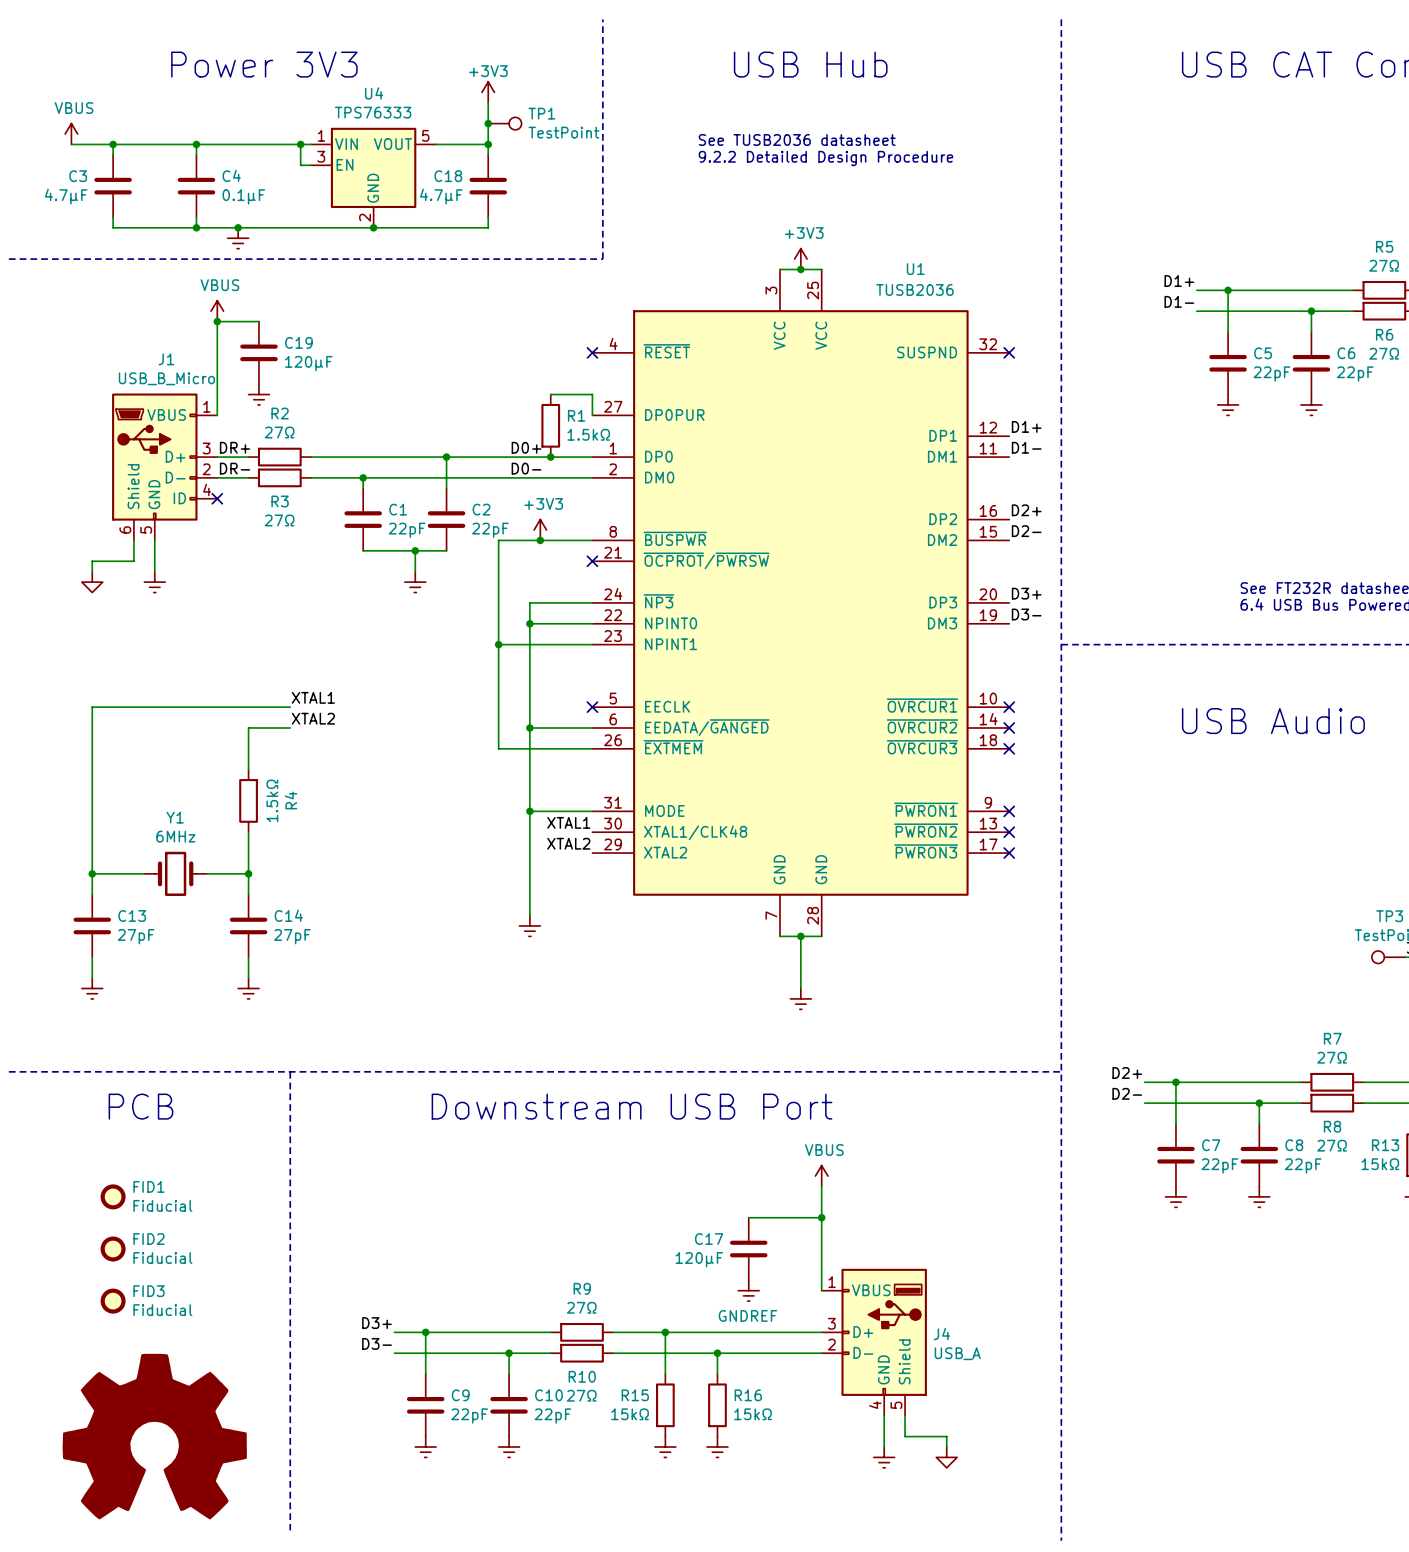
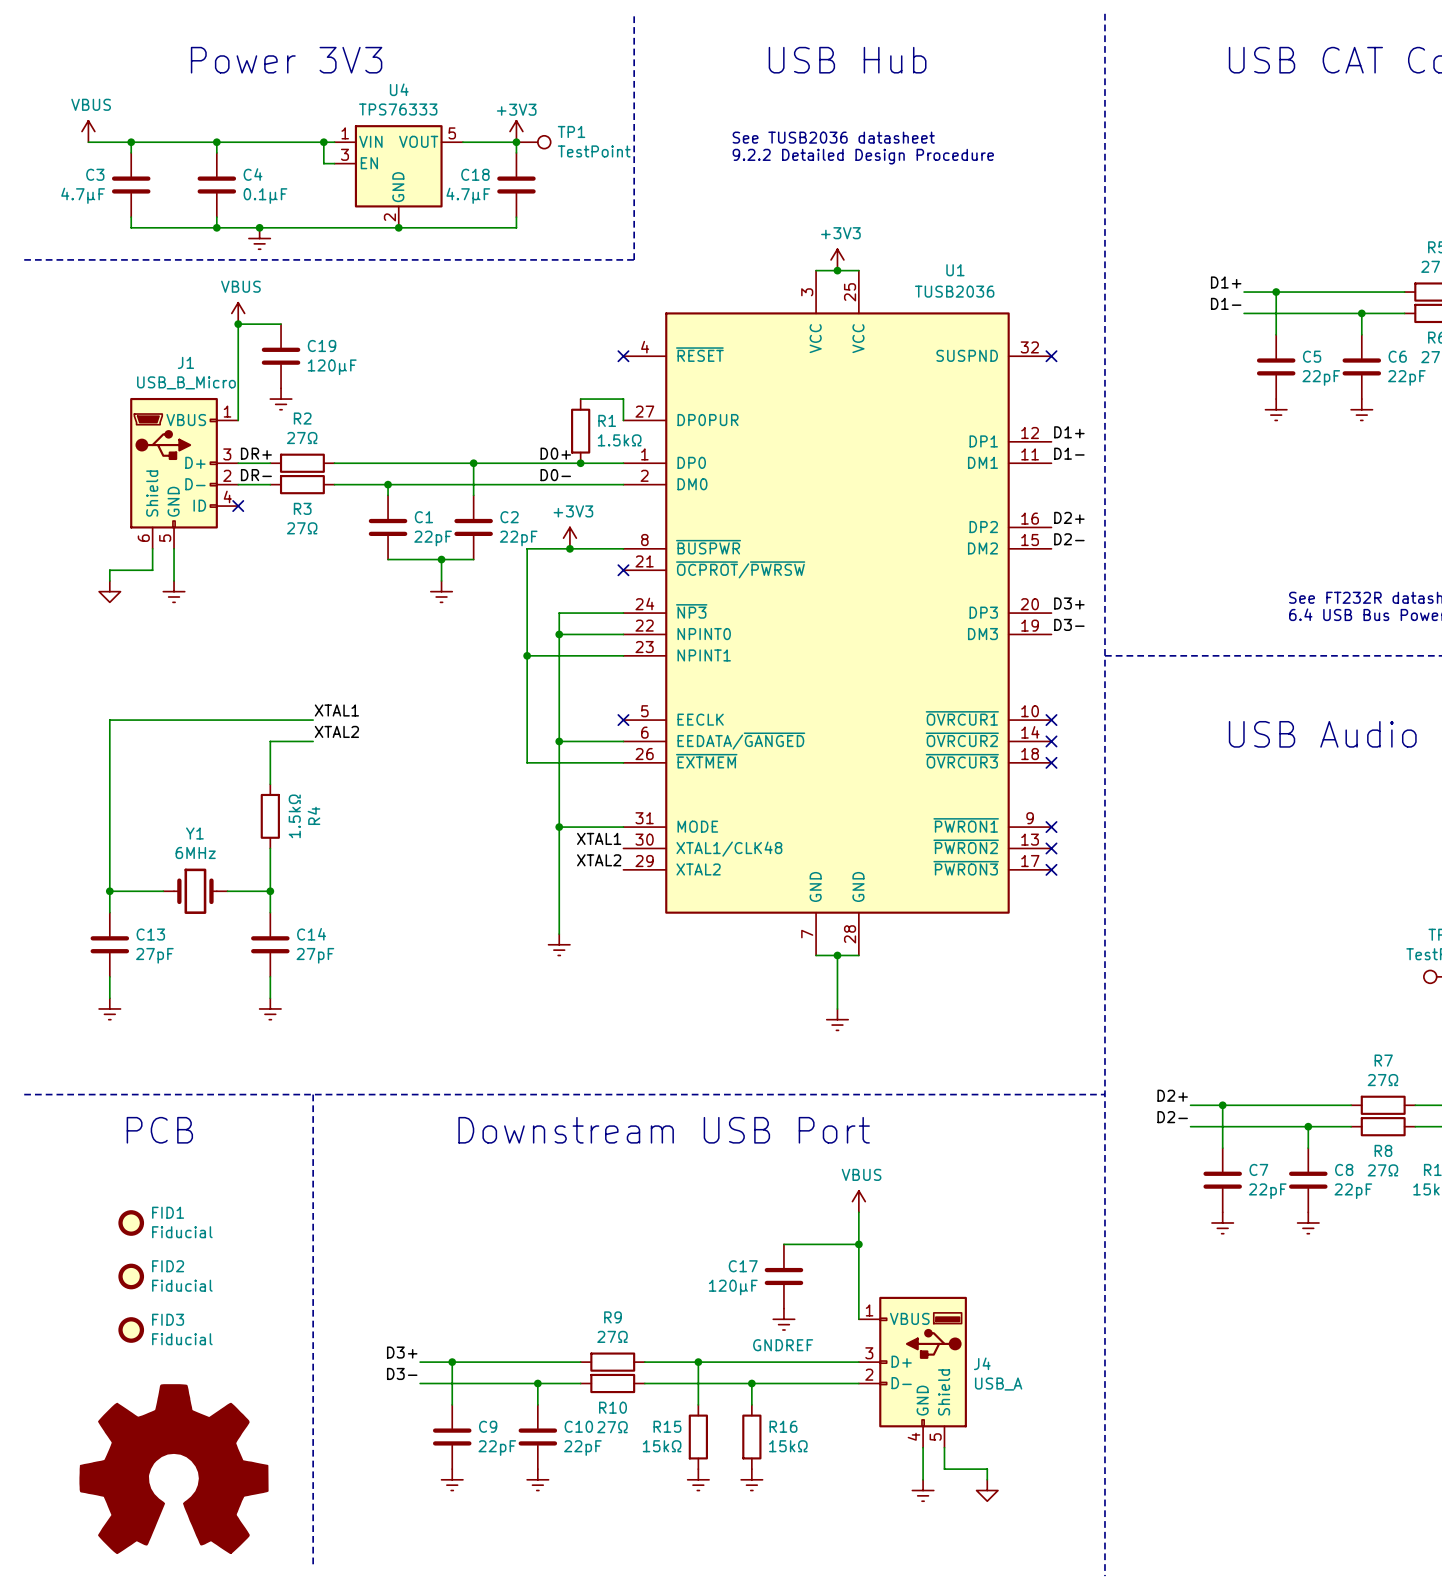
power symbol position: +3V3 (488, 92) -> +3V3 (516, 131)
junction: (488, 123) -> none
TP1 position: (504, 123) -> (533, 142)

